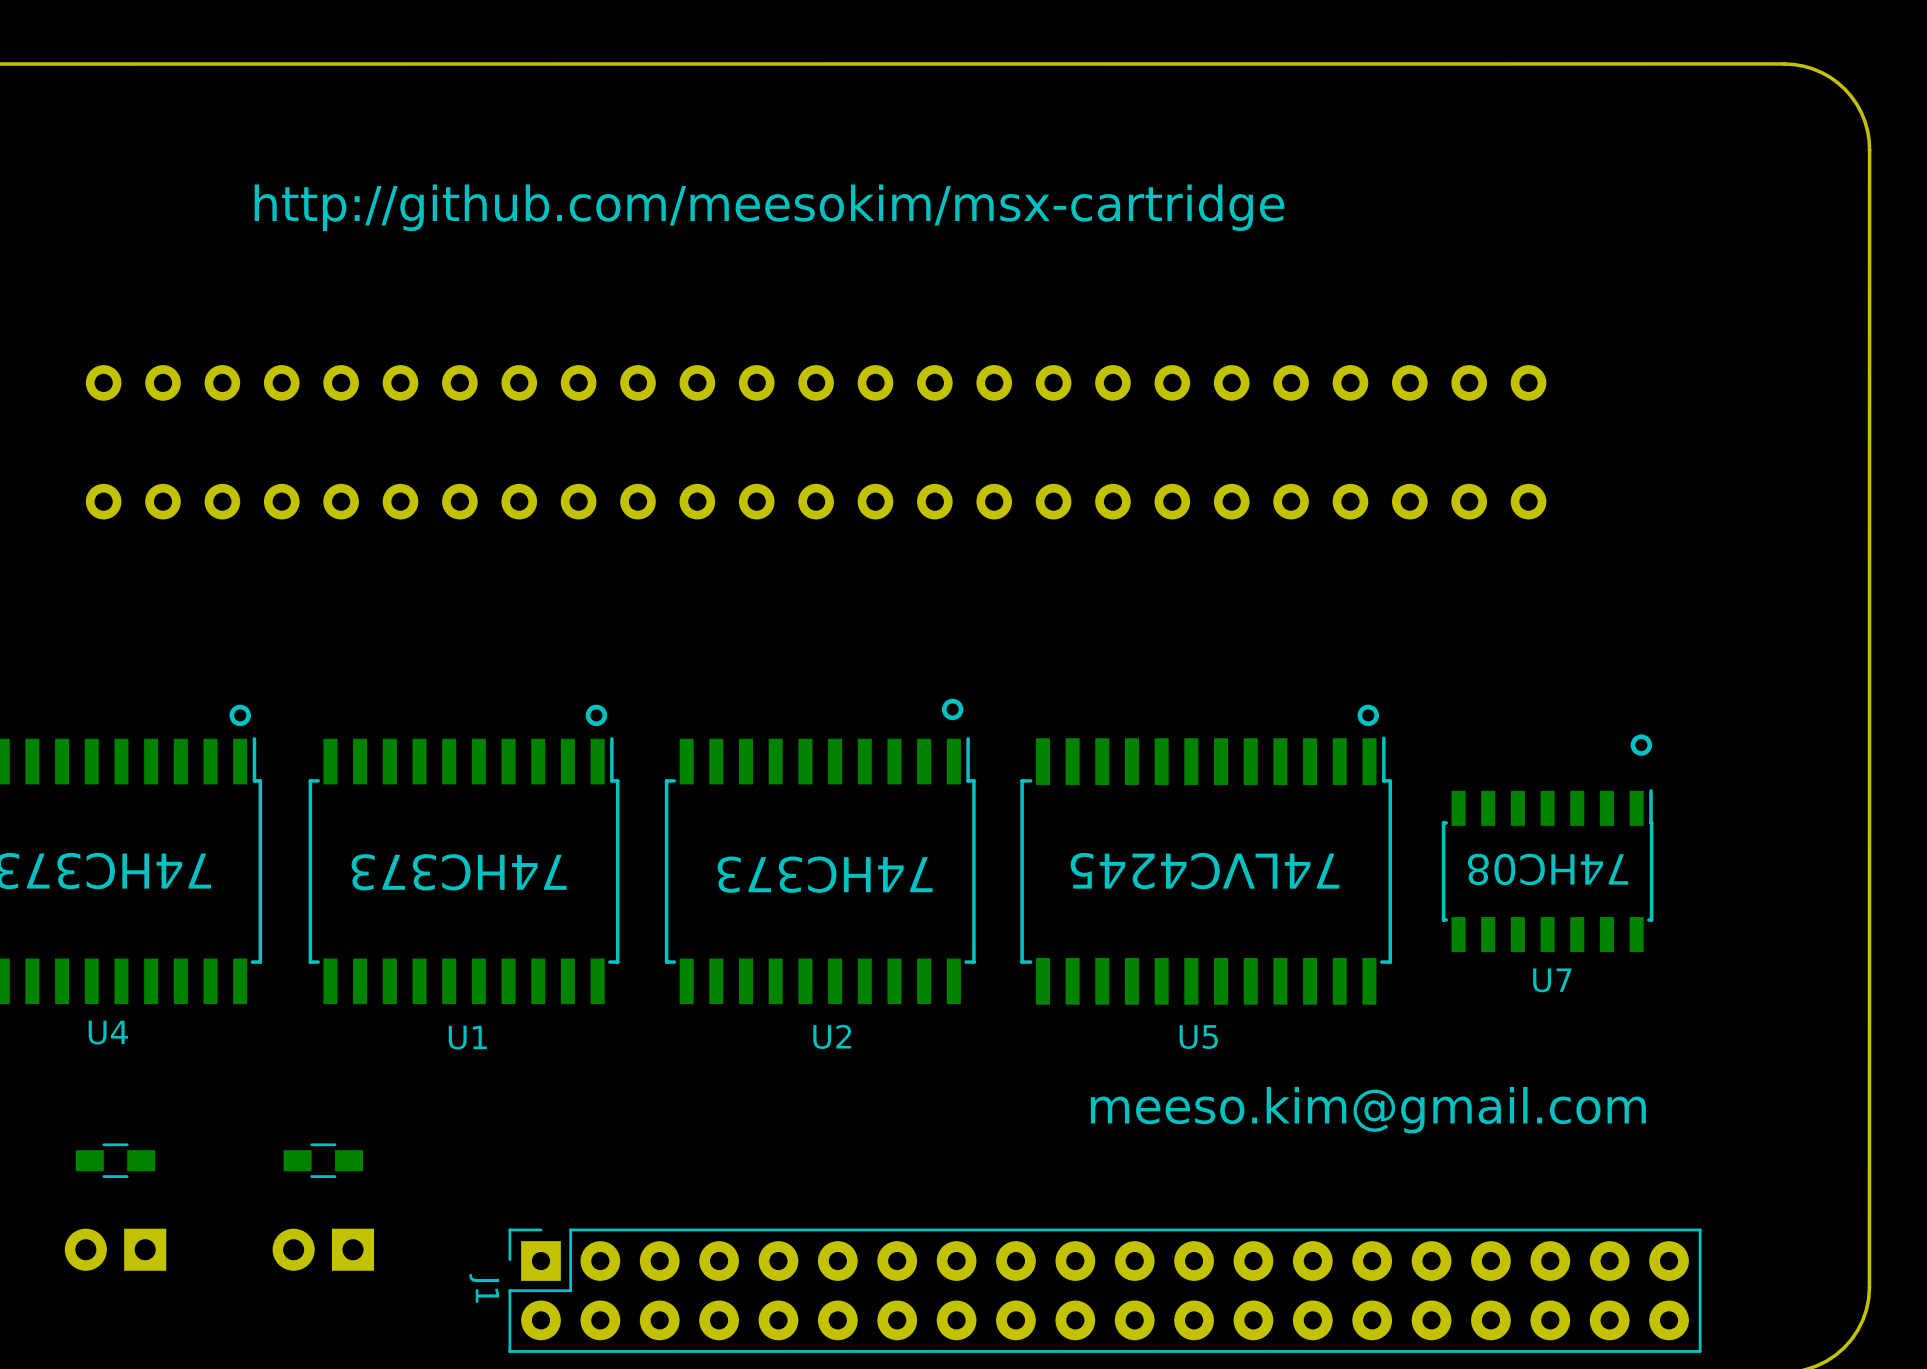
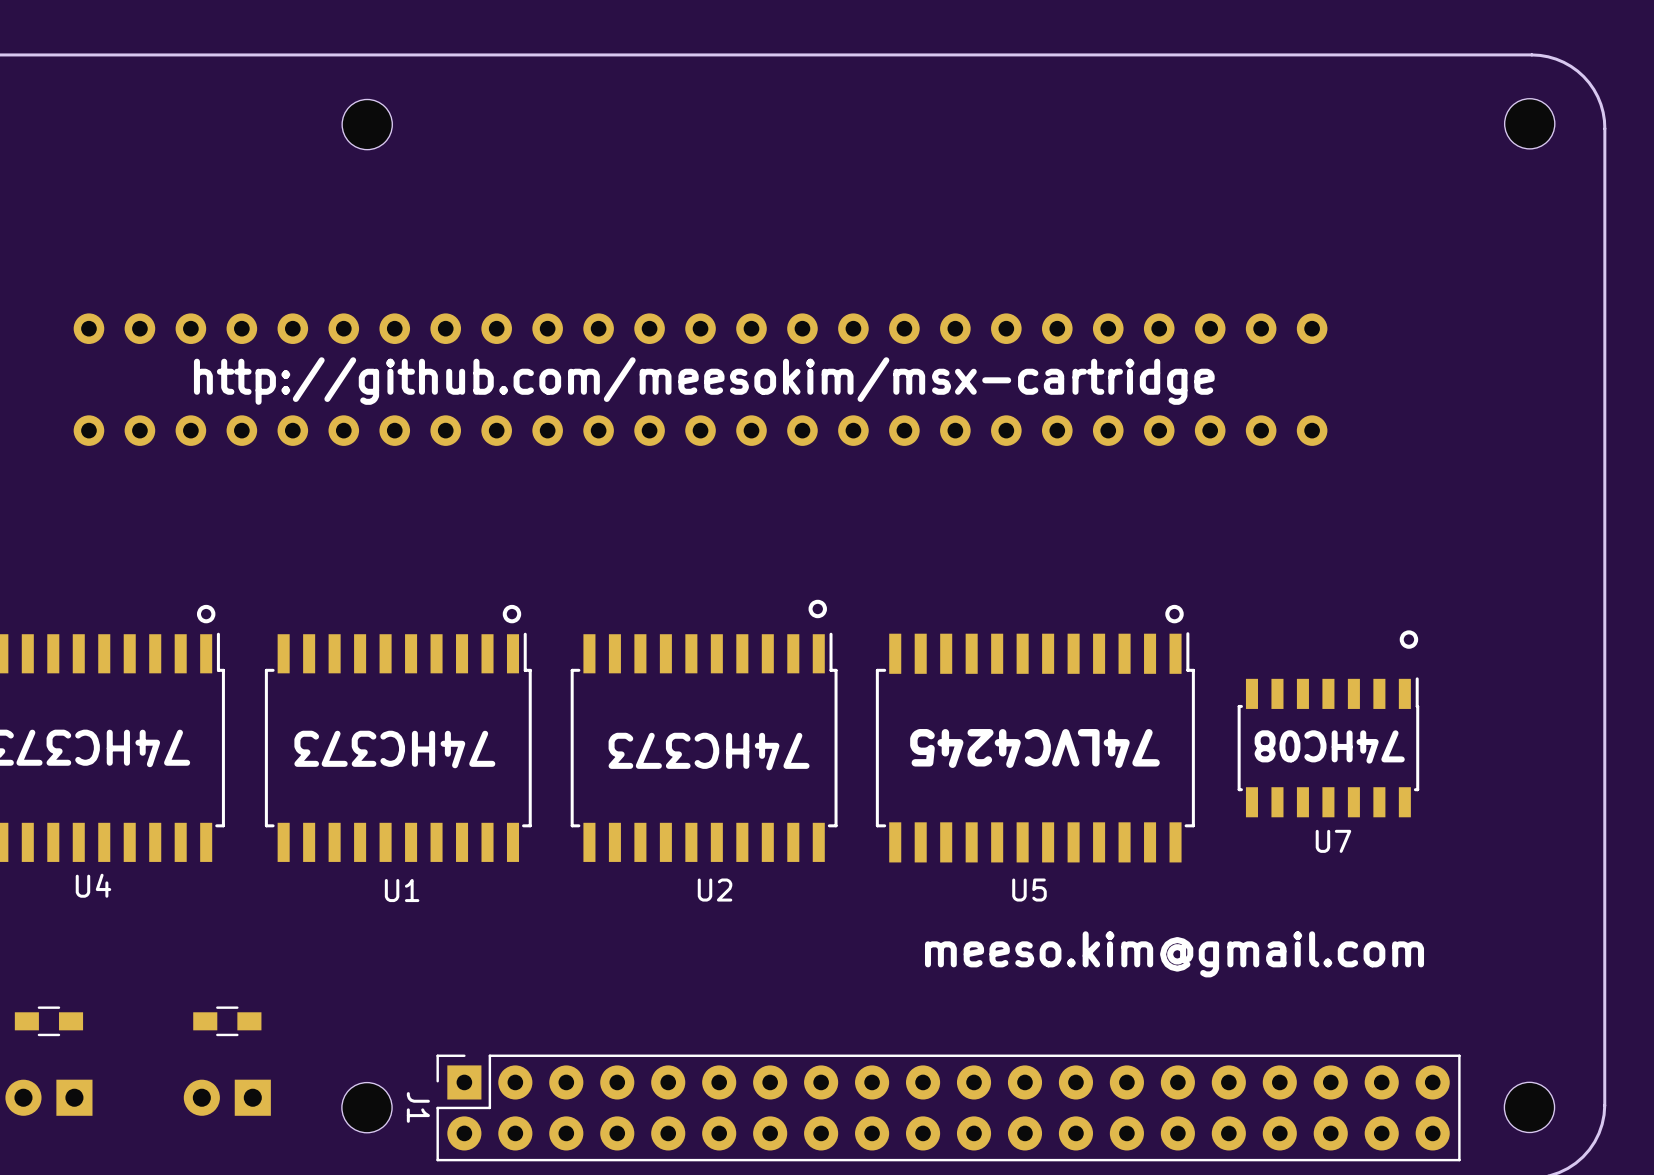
part: none -> (1529, 123)
part: none -> (367, 124)
text position: http://github.com/meesokim/msx-cartridge (769, 207) -> http://github.com/meesokim/msx-cartridge (704, 381)
part position: (115, 1160) -> (48, 1021)
part position: (323, 1160) -> (227, 1021)
part position: (115, 1249) -> (48, 1097)
part position: (323, 1249) -> (227, 1097)
part: none -> (366, 1107)
part: none -> (1529, 1107)

